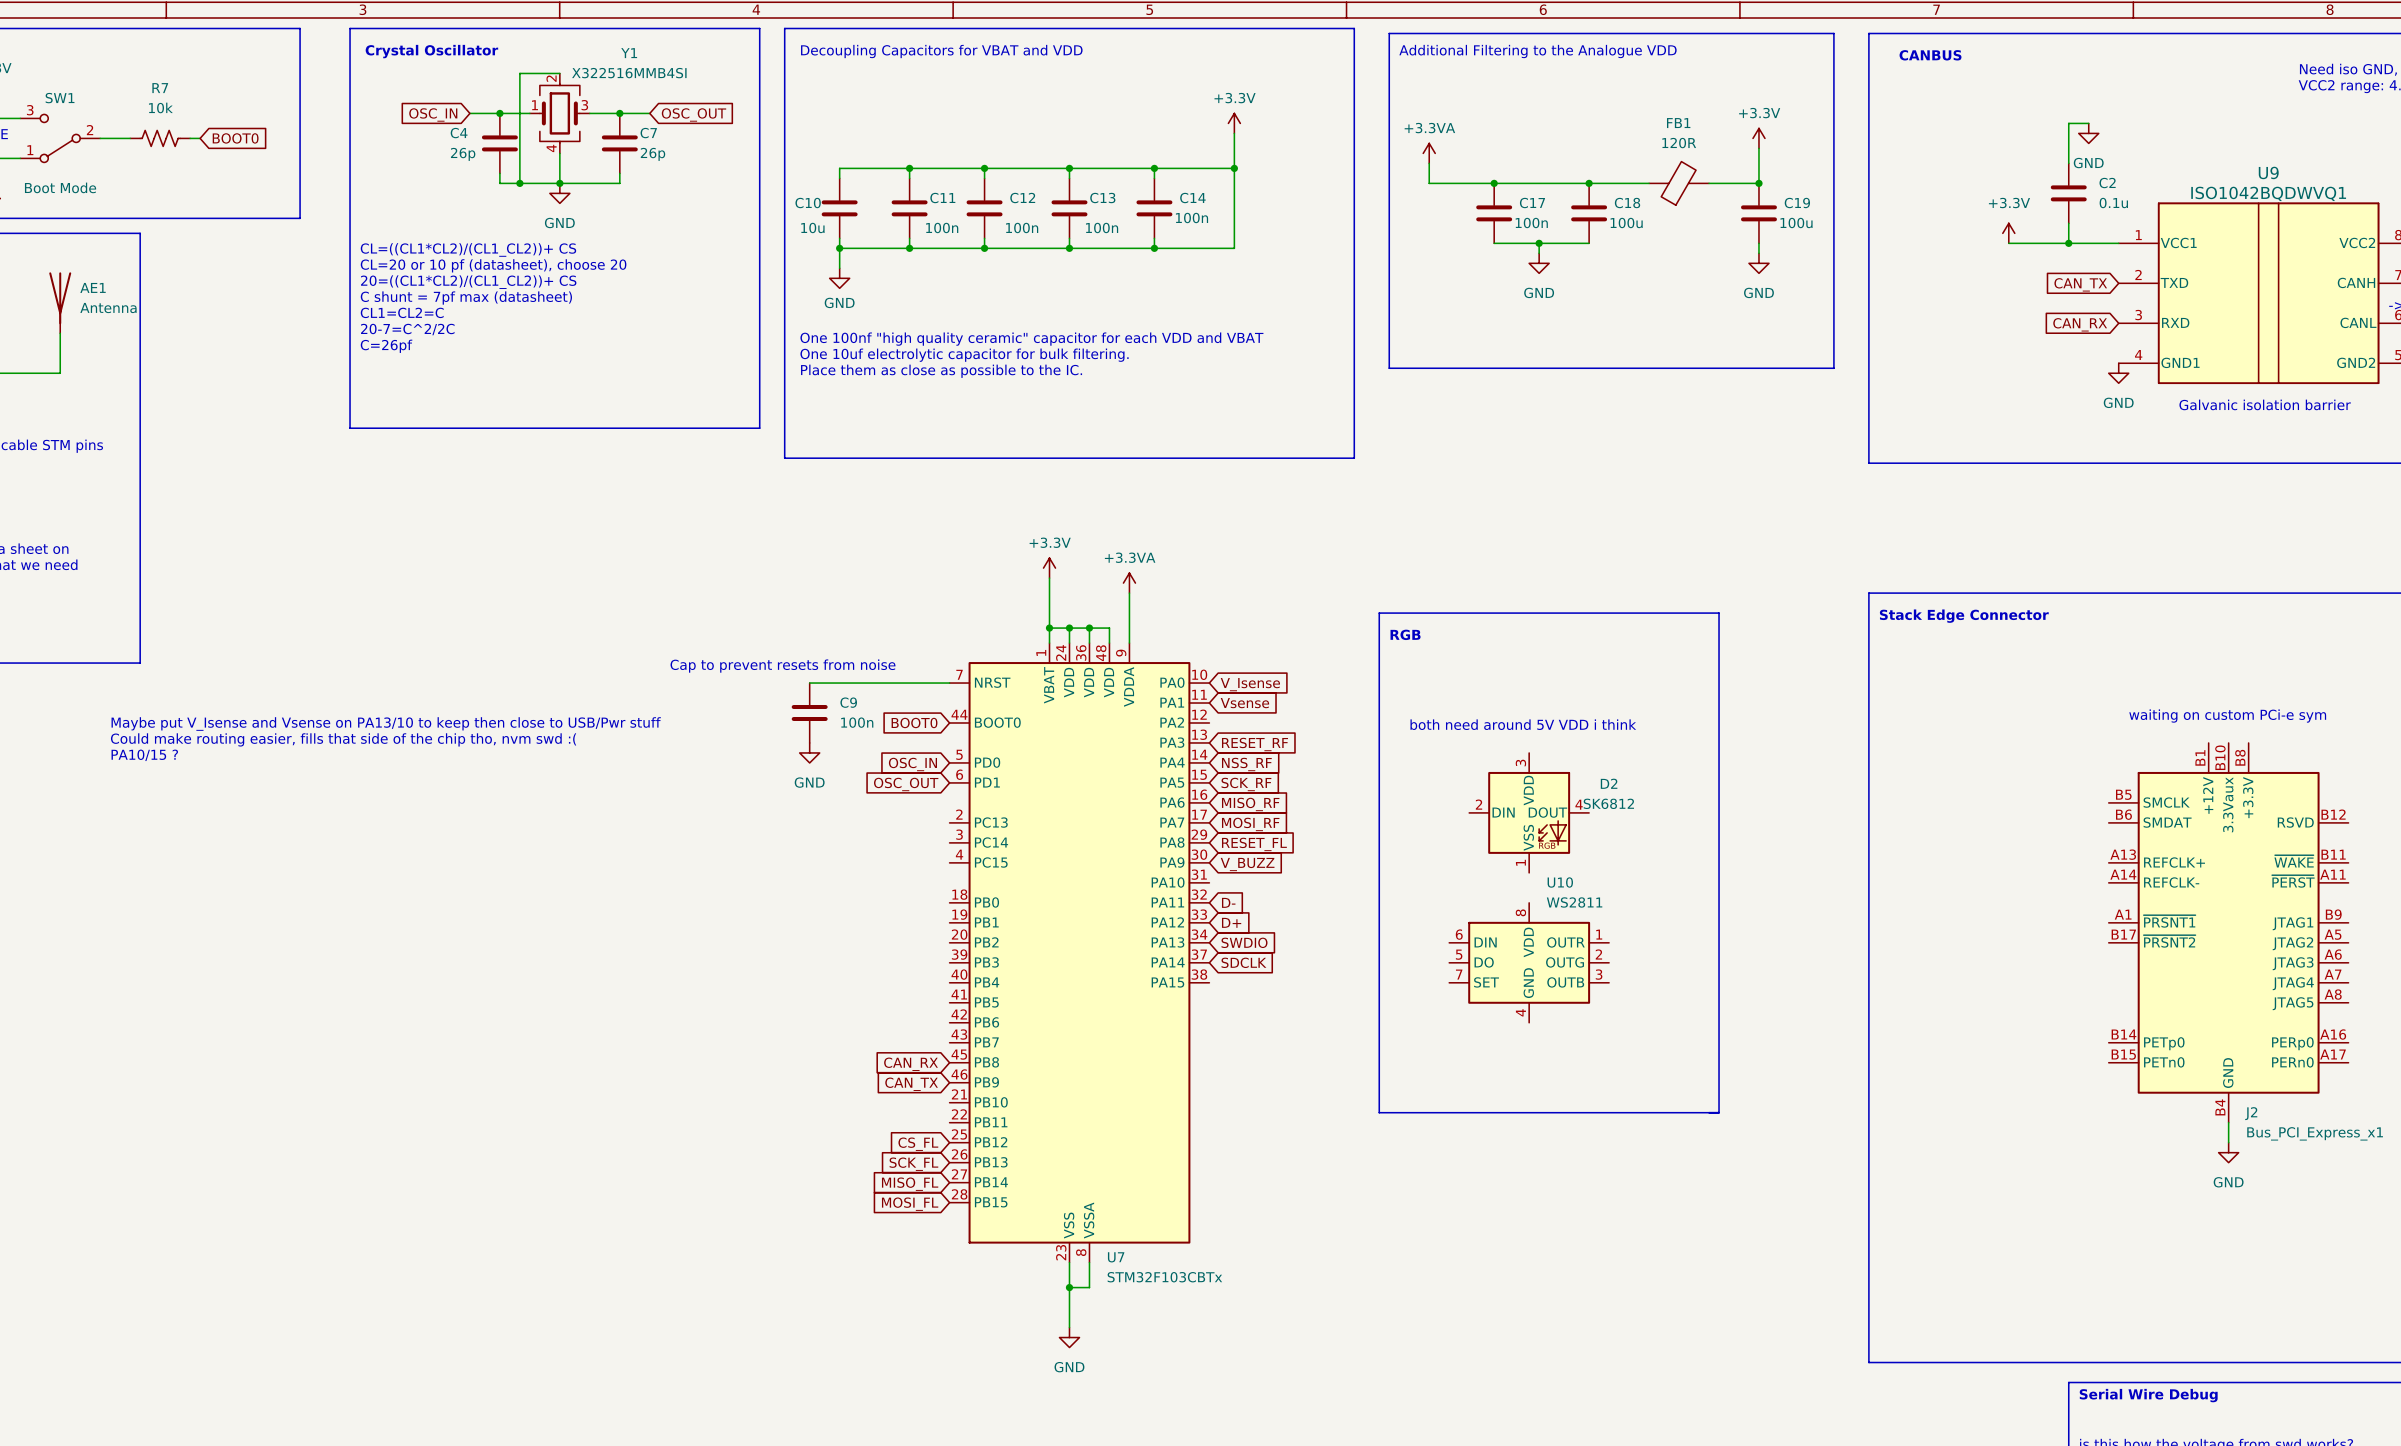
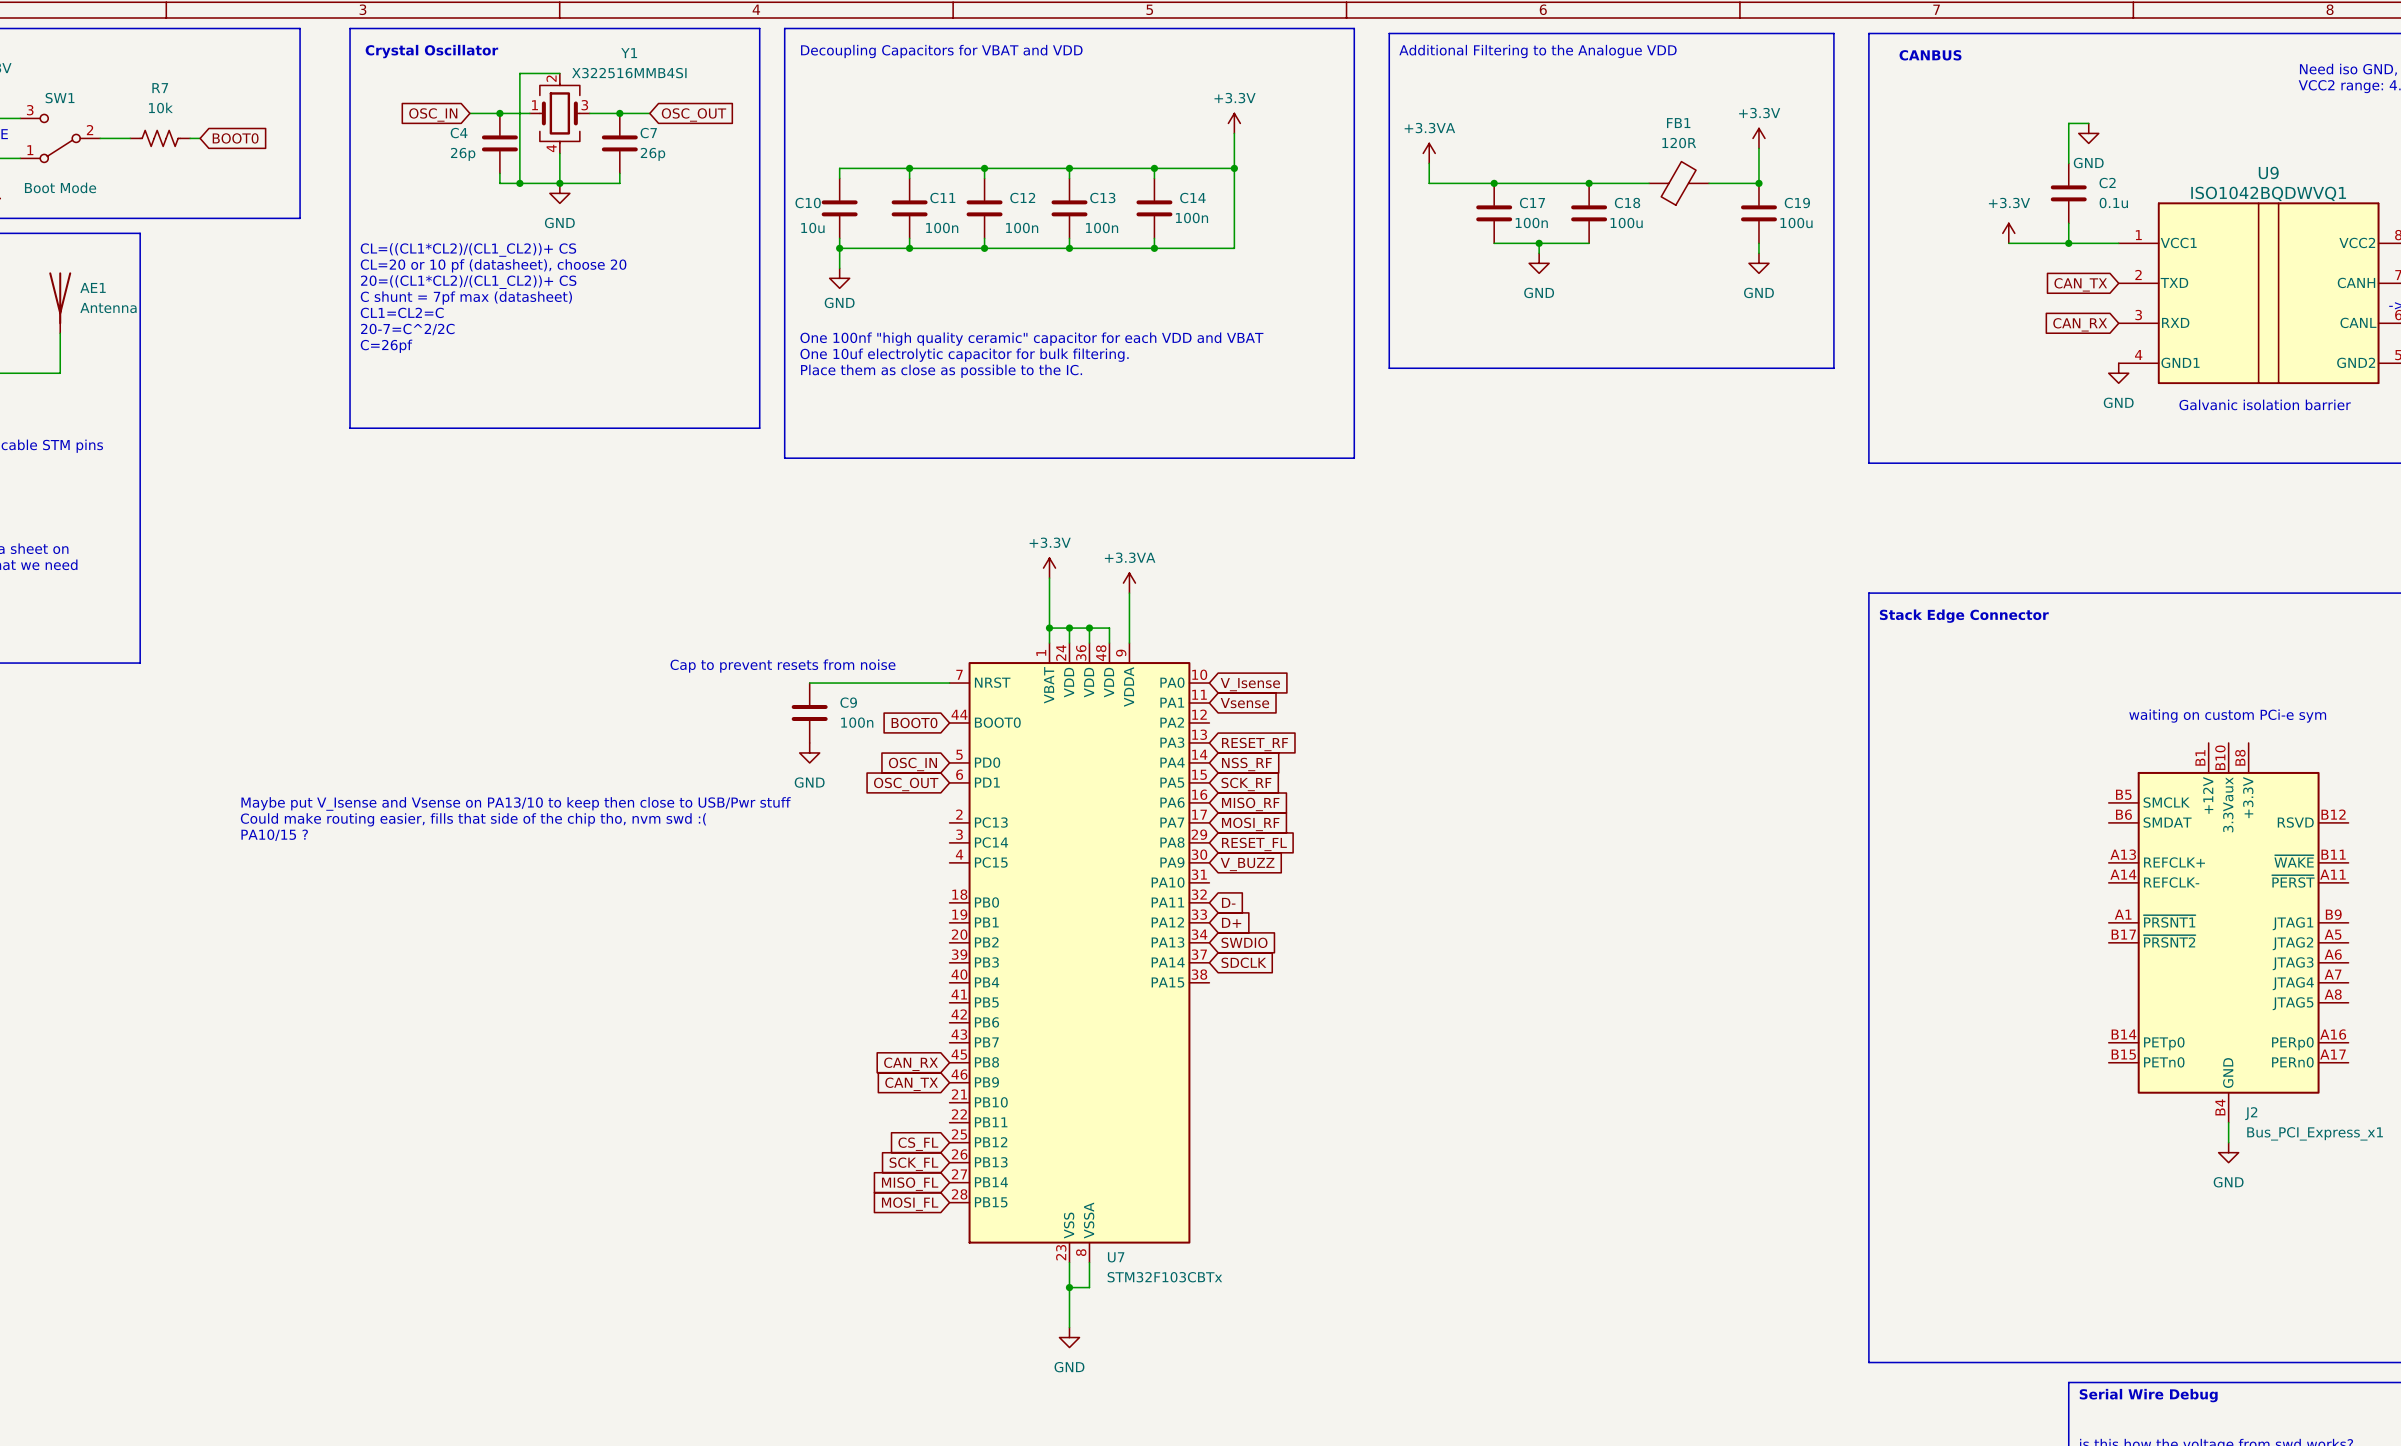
line: (1379, 613) (1719, 613) (1719, 1112) (1379, 1112) (1379, 613) -> none
text: RGB (1405, 634) -> none
text position: Maybe put V_Isense and Vsense on PA13/10 to keep then close to USB/Pwr stuff (386, 724) -> Maybe put V_Isense and Vsense on PA13/10 to keep then close to USB/Pwr stuff (516, 803)
text: both need around 5V VDD i think (1523, 724) -> none
text position: Could make routing easier, fills that side of the chip tho, nvm swd :( (343, 739) -> Could make routing easier, fills that side of the chip tho, nvm swd :( (473, 819)
text position: PA10/15 ? (144, 755) -> PA10/15 ? (274, 835)
D2: SK6812 (1529, 812) -> none
U10: WS2811 (1529, 962) -> none

